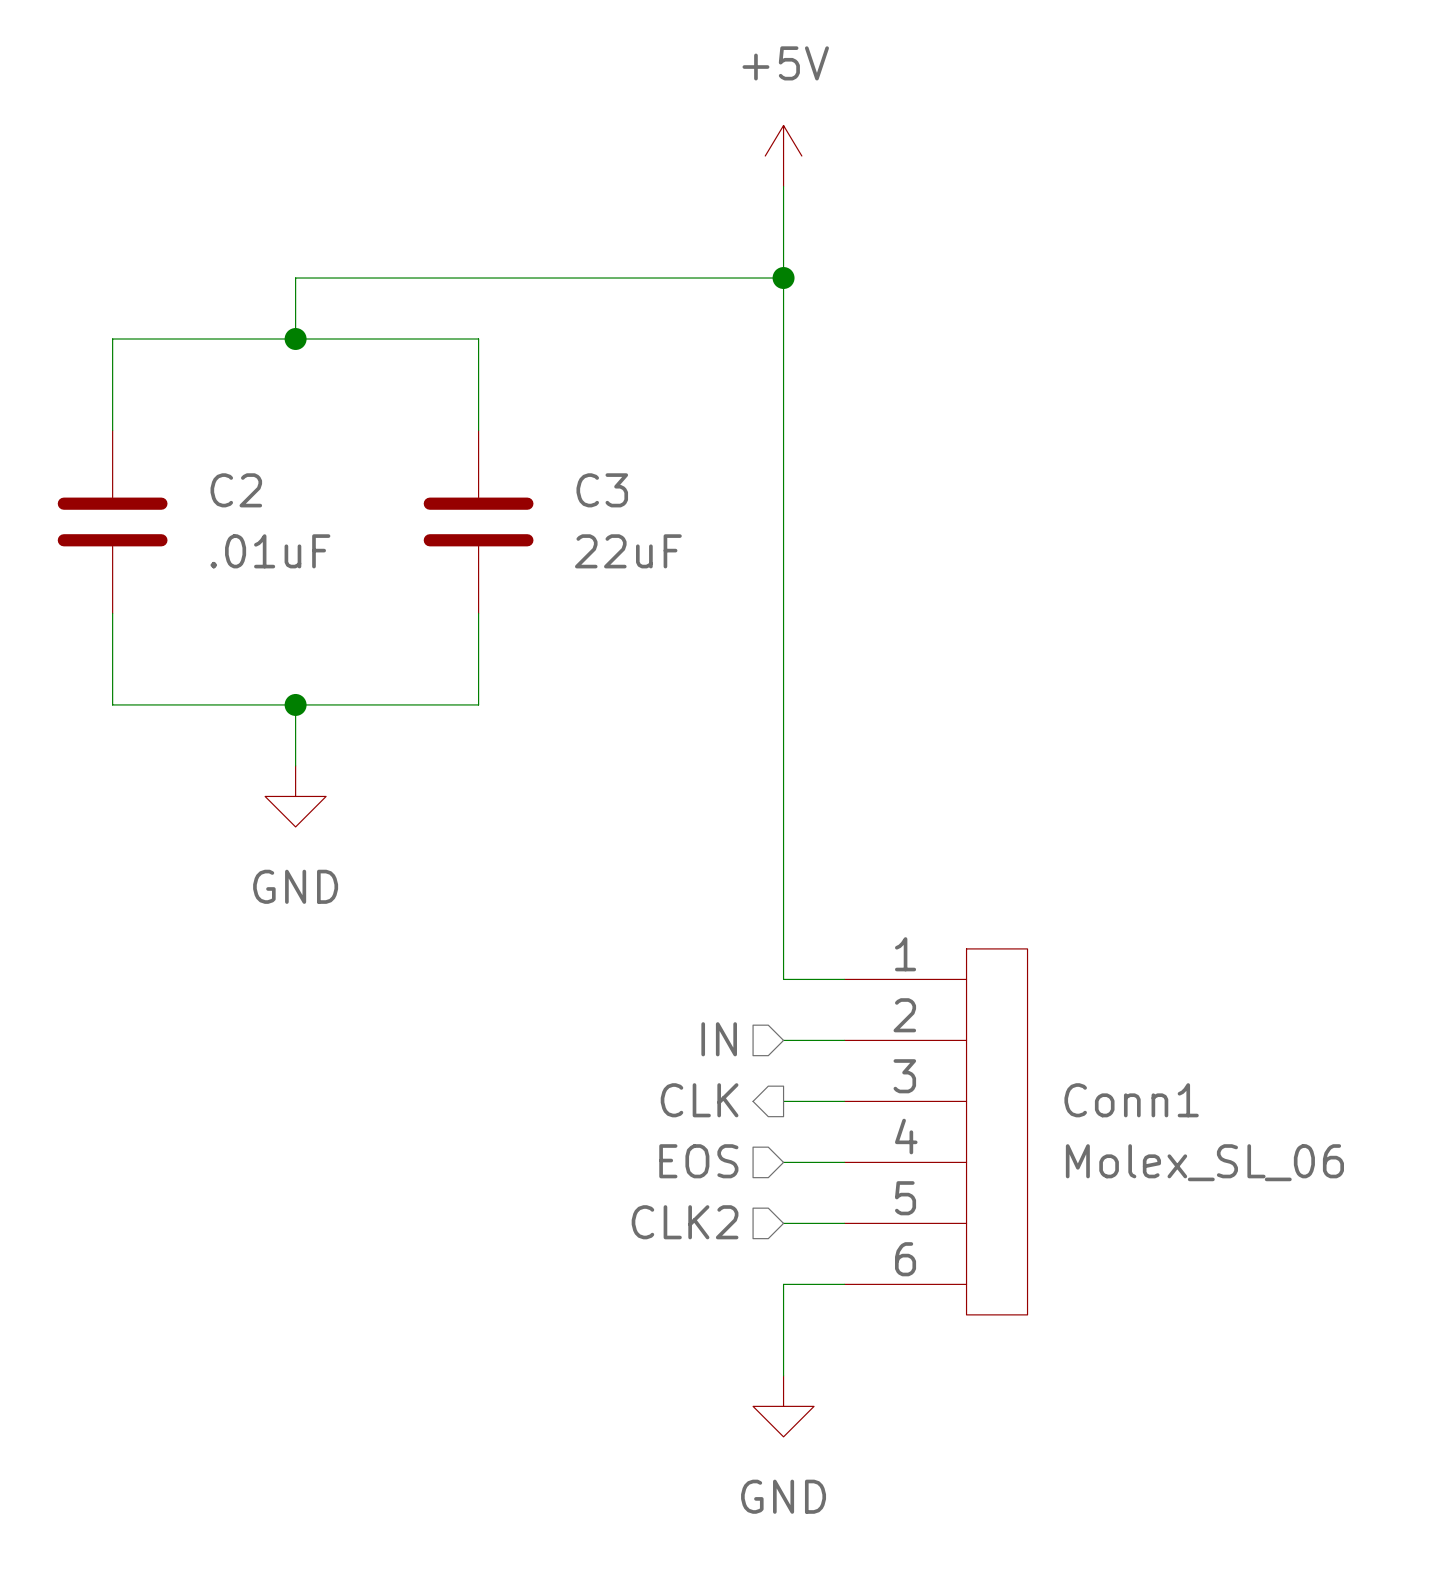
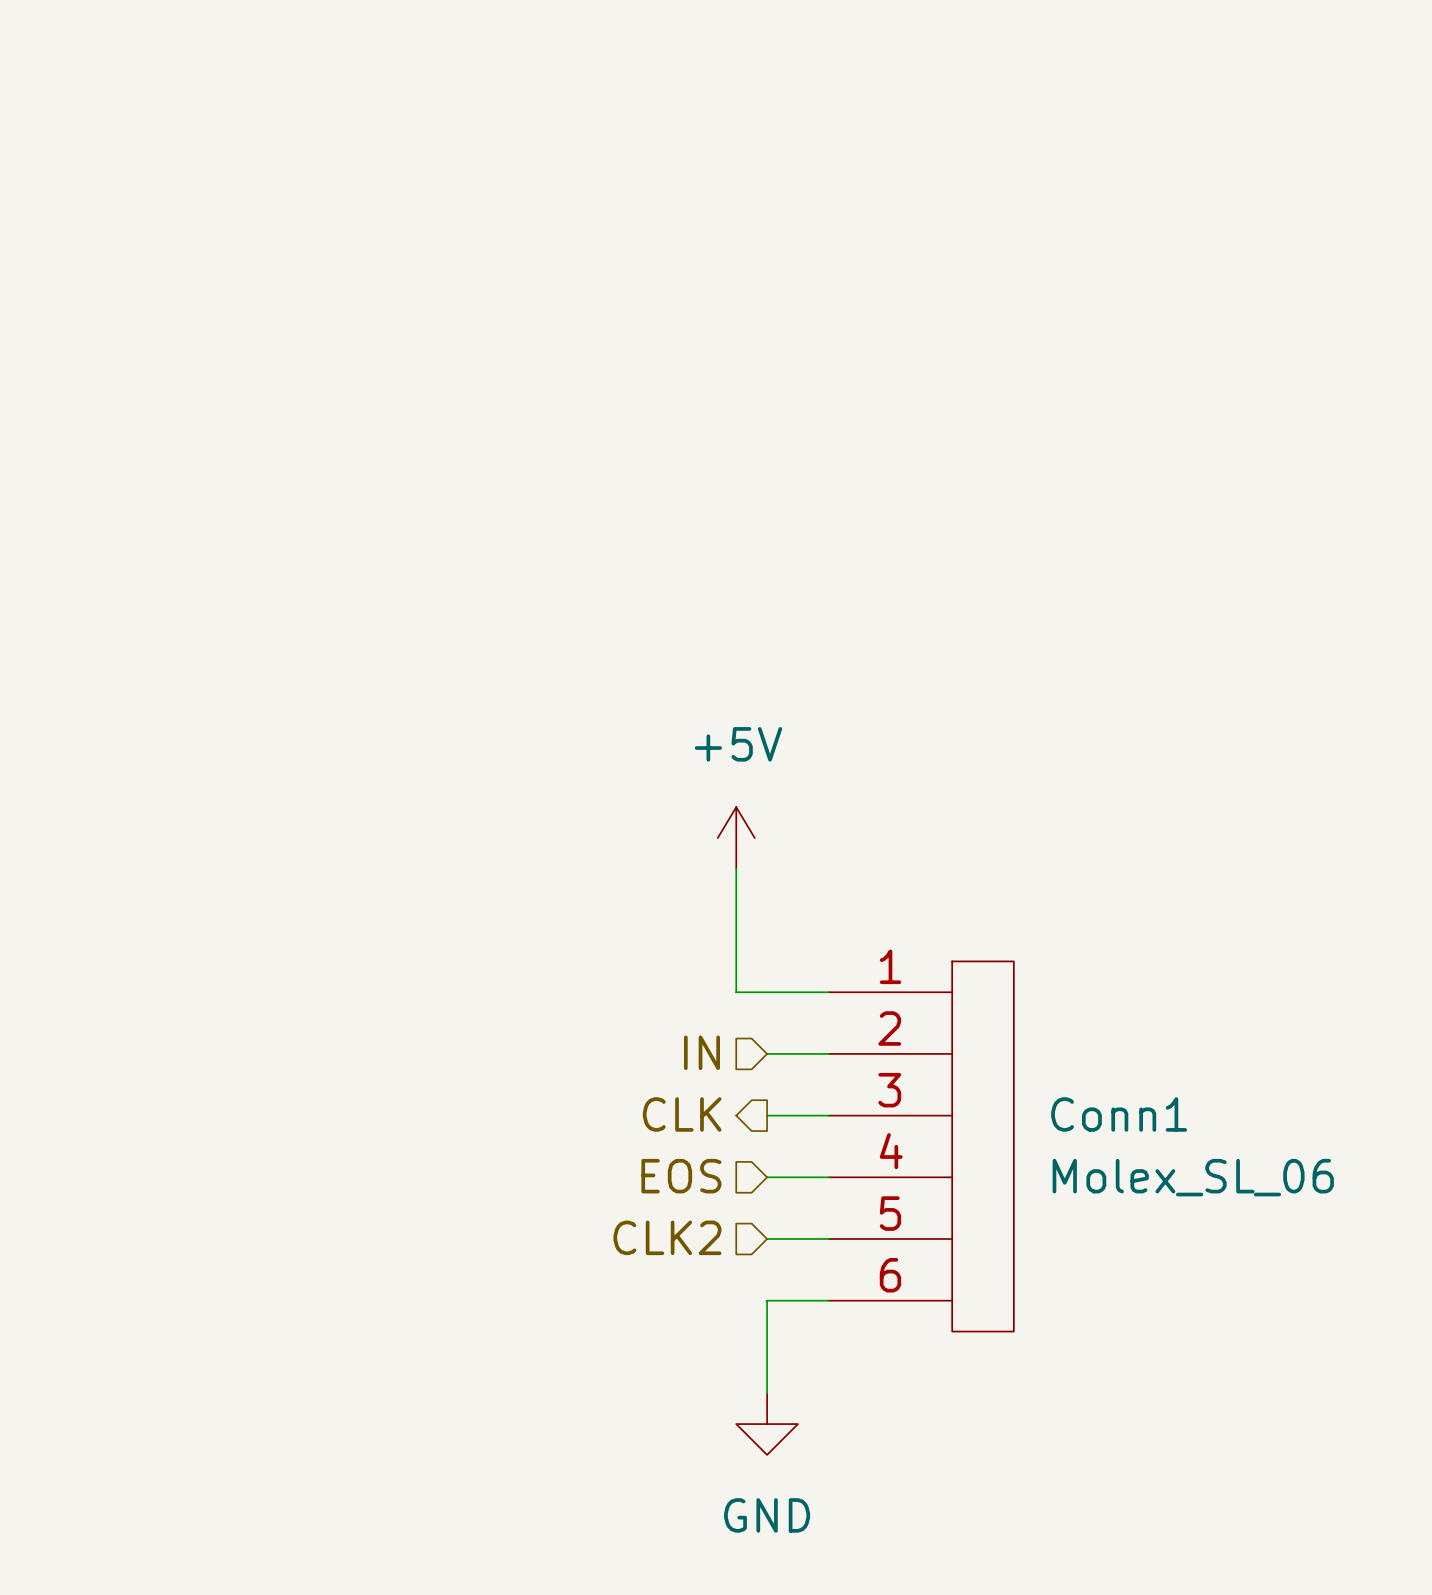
power symbol: +5V (783, 156) -> none
wire: (783, 186) (783, 979) -> (736, 868) (736, 992) (767, 992)
wire: (783, 278) (295, 278) (295, 338) -> none
junction: (783, 278) -> none
junction: (295, 338) -> none
wire: (112, 430) (112, 338) (478, 338) (478, 430) -> none
C2: .01uF (112, 521) -> none
C3: 22uF (478, 521) -> none
wire: (112, 613) (112, 704) (478, 704) (478, 613) -> none
wire: (295, 704) (295, 765) -> none
junction: (295, 704) -> none
power symbol: GND (295, 796) -> none
power symbol: none -> +5V (736, 838)

